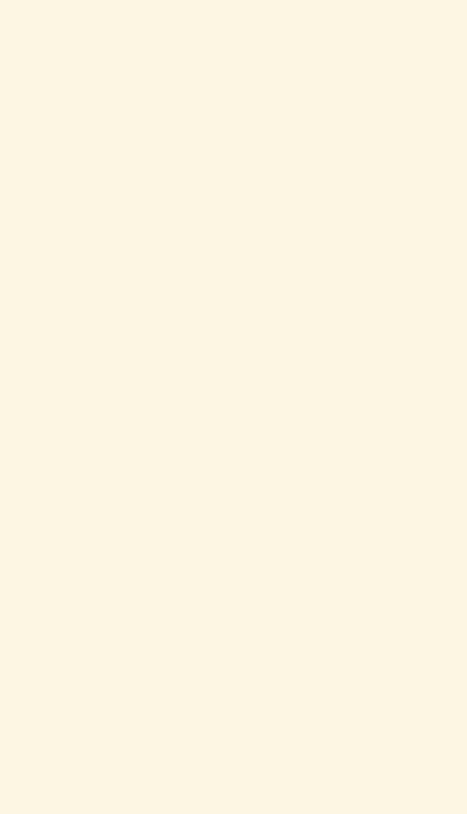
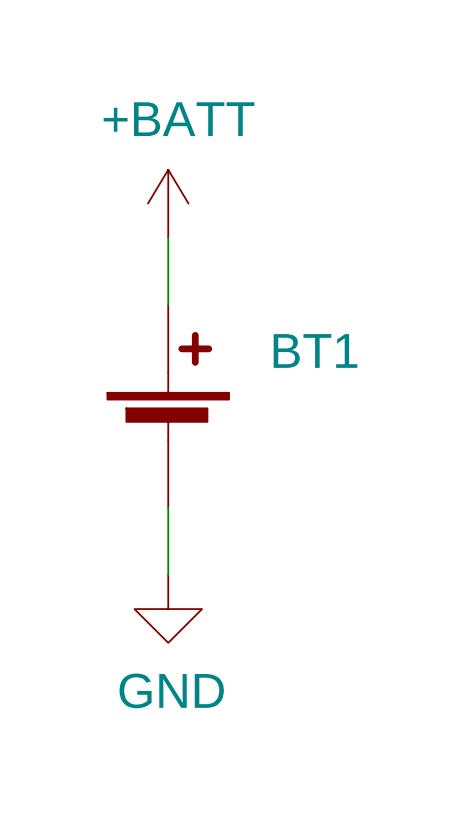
power symbol: none -> +BATT (168, 203)
wire: none -> (168, 237) (168, 304)
BT1: none -> (168, 406)
wire: none -> (168, 507) (168, 575)
power symbol: none -> GND (168, 609)

